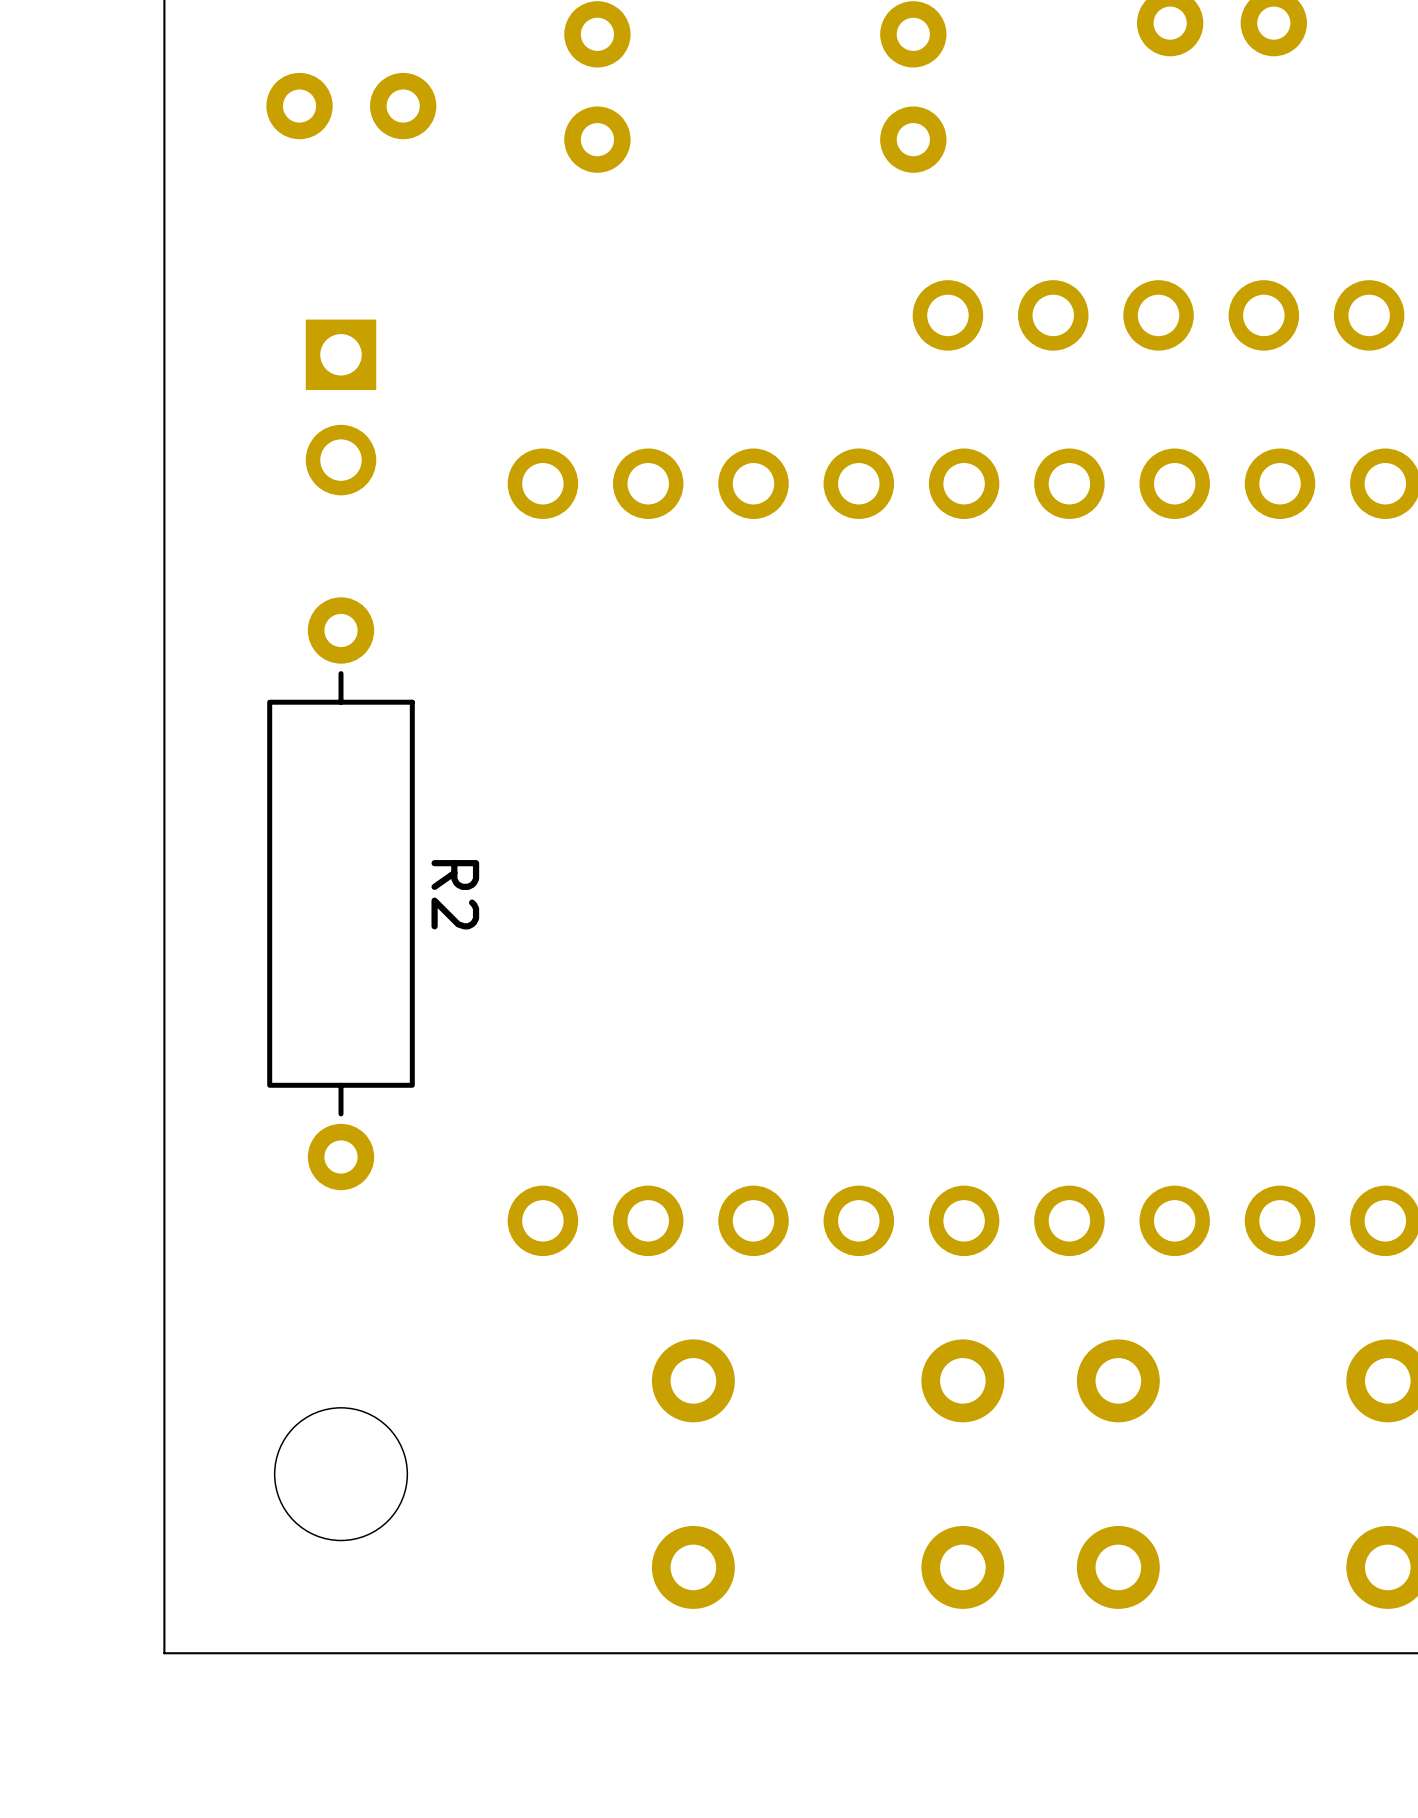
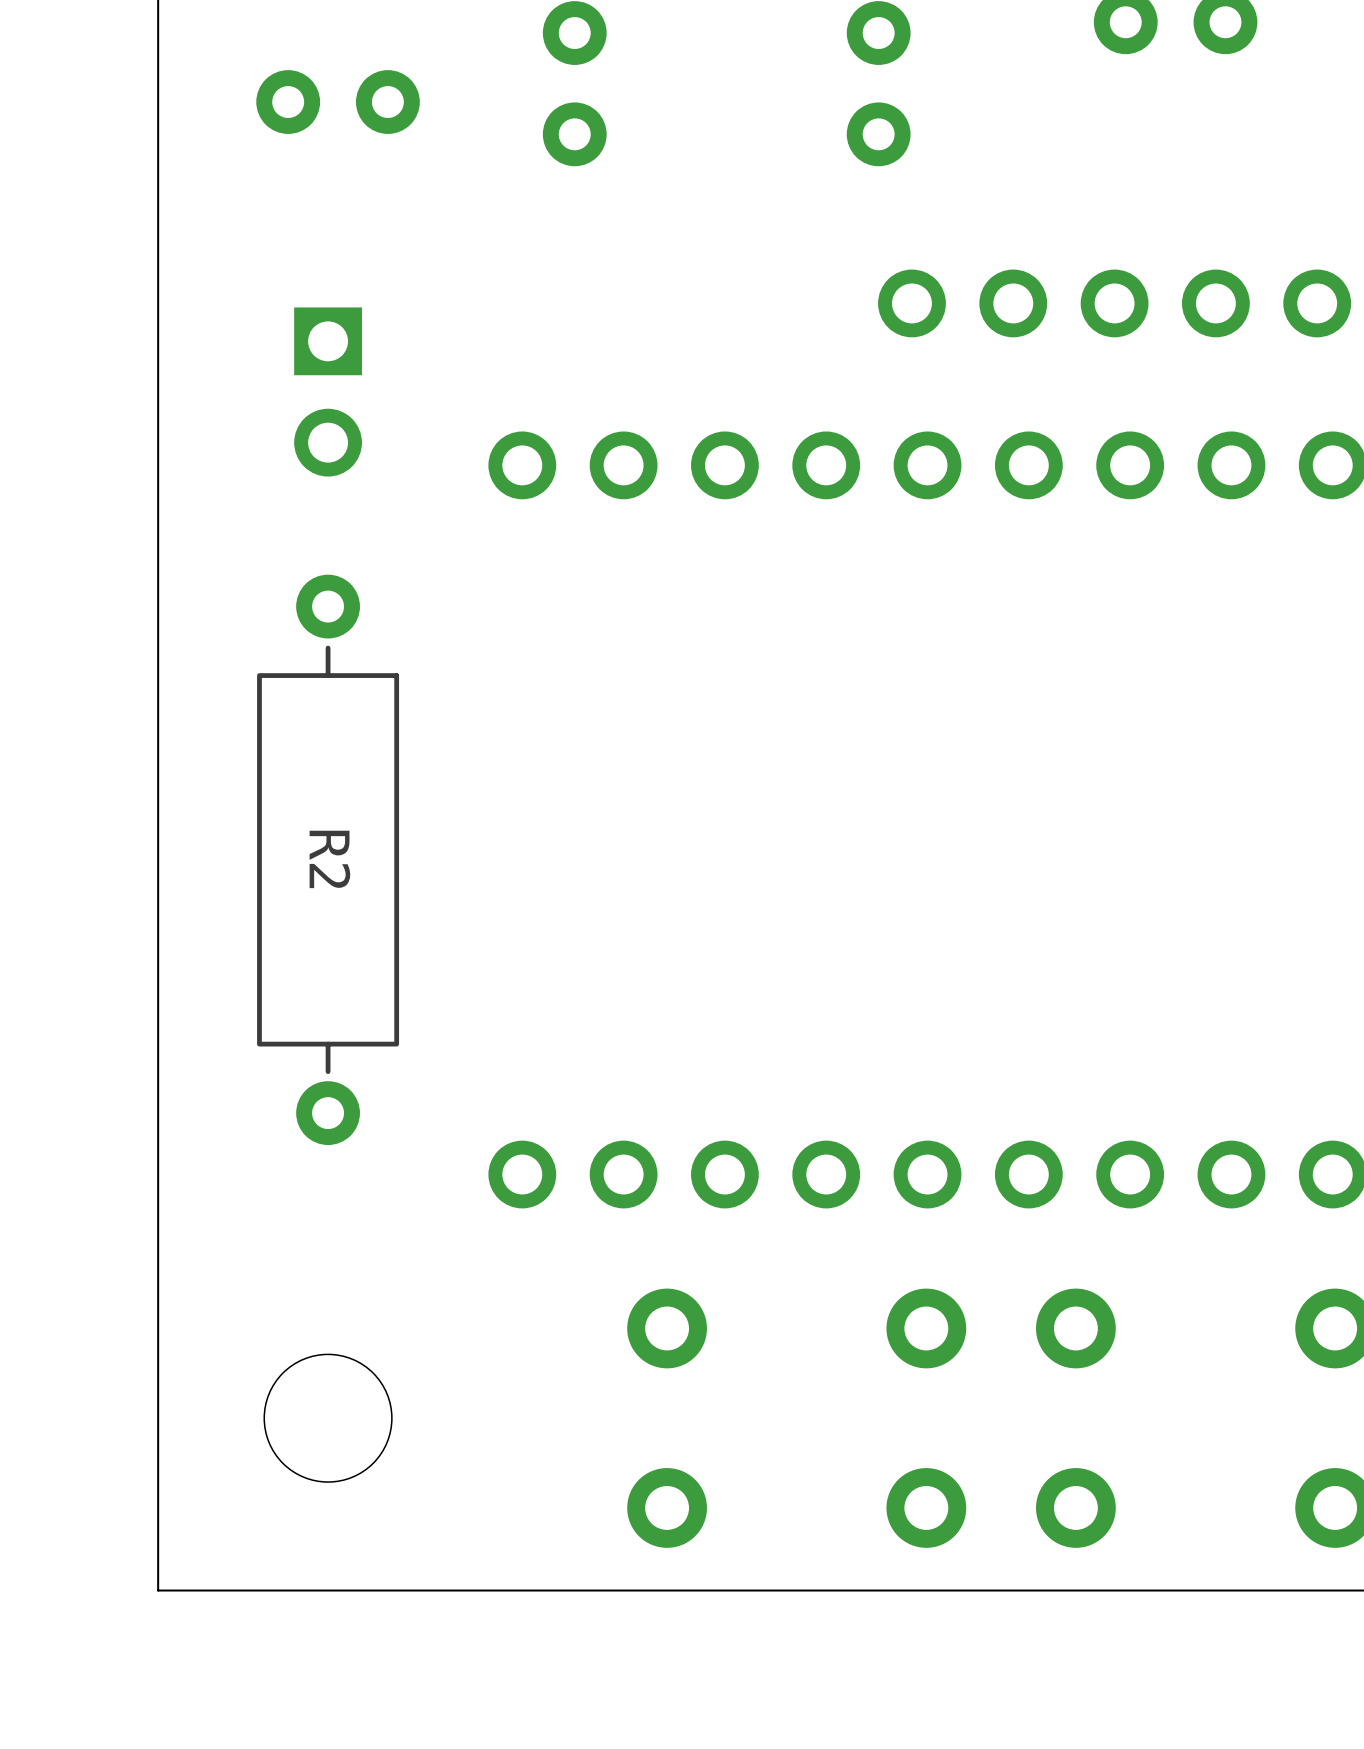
R2 name position: R2 (455, 894) -> R2 (329, 859)

